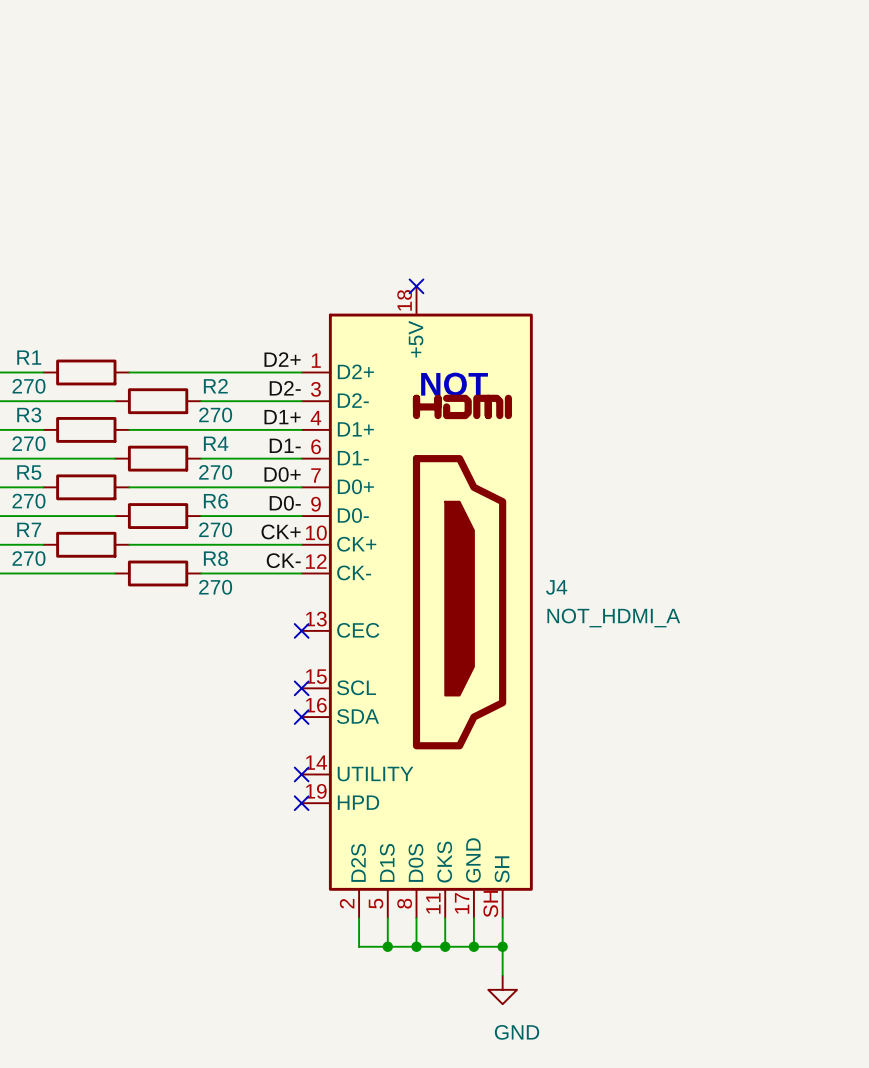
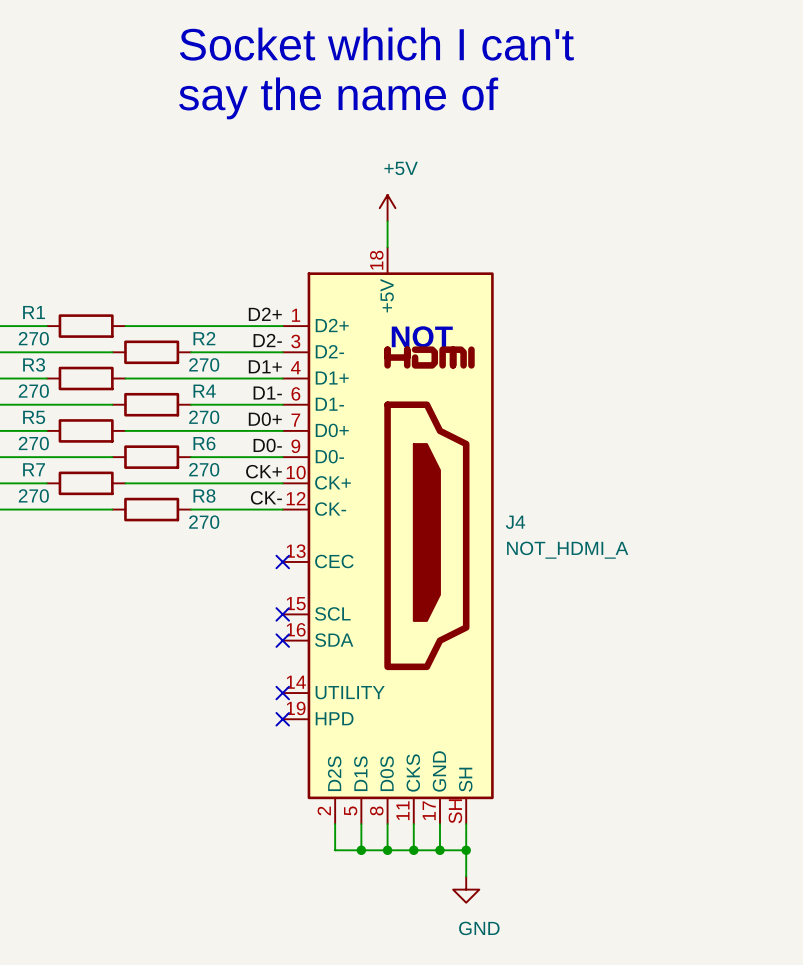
text: none -> Socket which I can't (376, 44)
text: none -> say the name of (338, 98)
power symbol: none -> +5V (387, 208)
wire: none -> (387, 221) (387, 247)
no-connect mark: (416, 286) -> none

